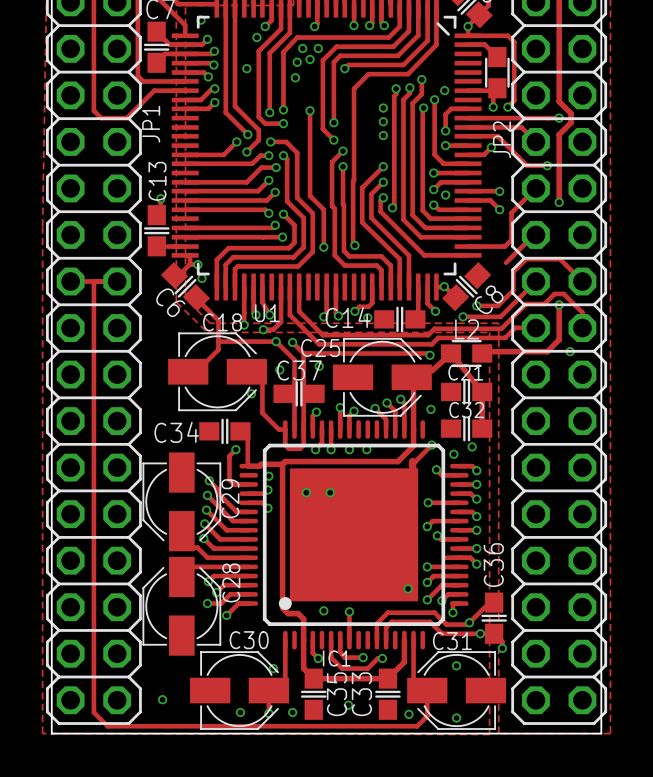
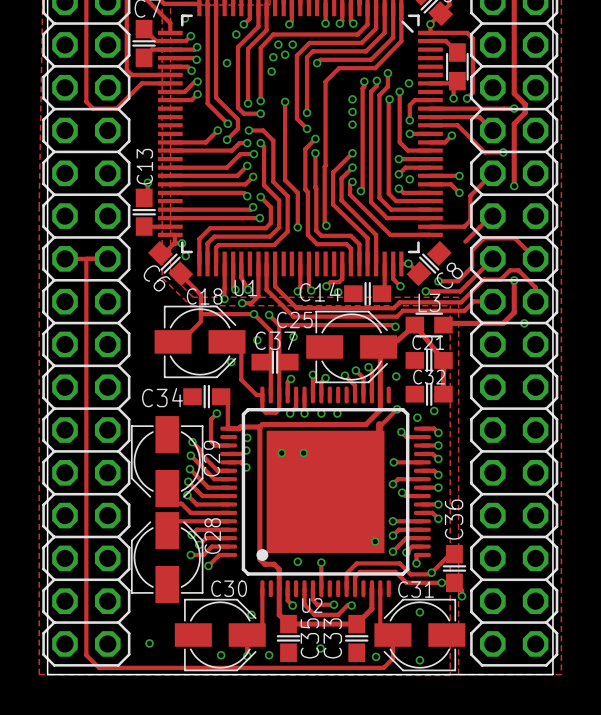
JP1 name: JP1 (151, 124) -> none
JP2 name: JP2 (501, 139) -> none
L2 name: L2 (467, 329) -> L3 (429, 302)
track: (446, 557) (459, 557) -> none
IC1 name: IC1 (336, 658) -> U2 (312, 605)

